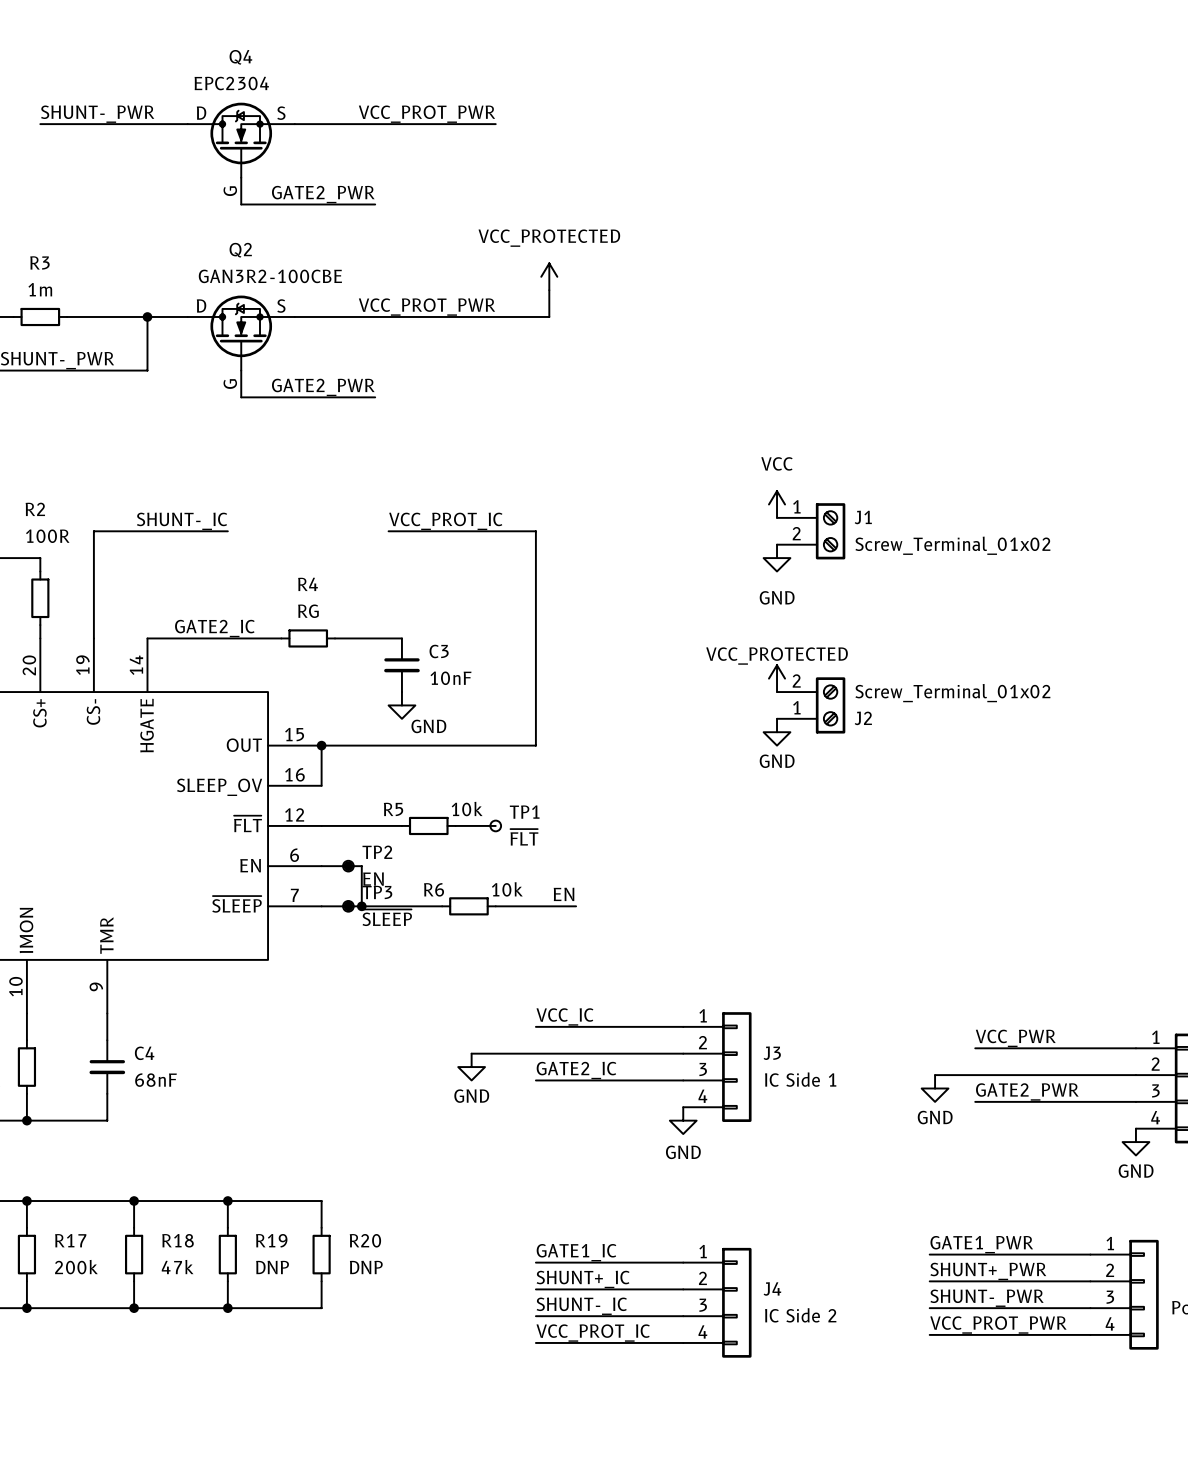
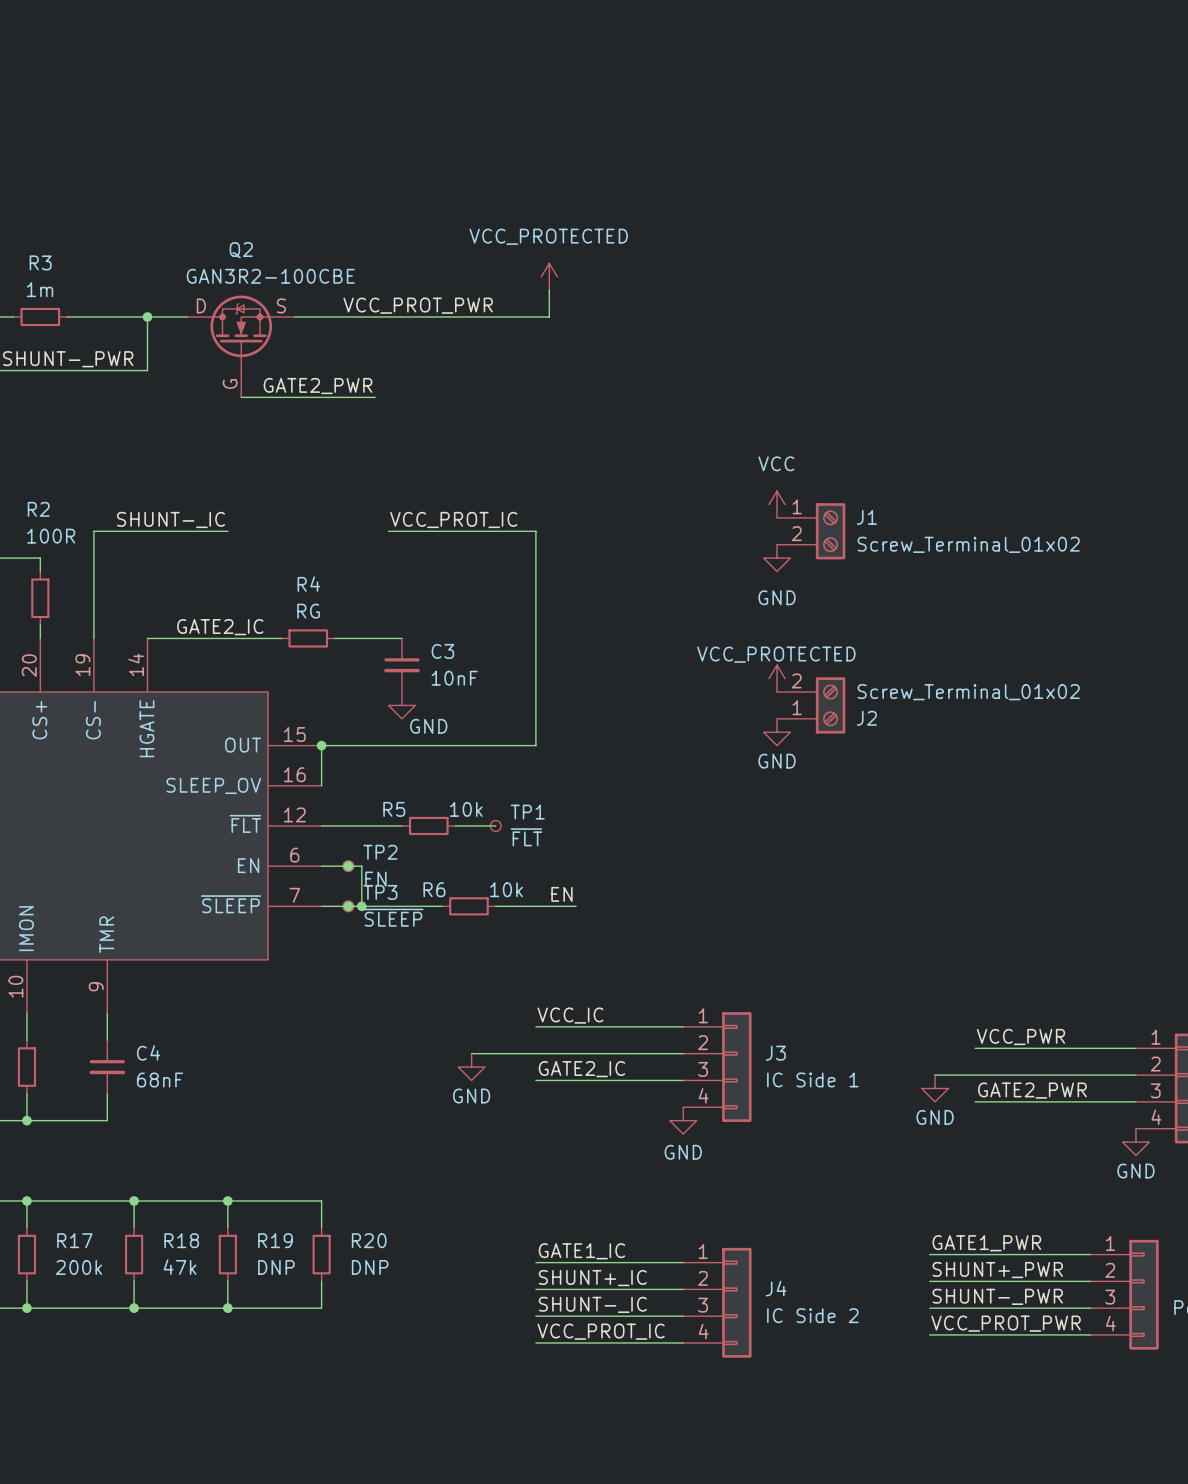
label: SHUNT-_PWR (97, 114) -> none
label: VCC_PROT_PWR (427, 114) -> none
wire: (40, 124) (187, 124) -> none
wire: (294, 124) (495, 124) -> none
Q4: EPC2304 (241, 153) -> none
label: GATE2_PWR (323, 194) -> none
wire: (241, 204) (375, 204) -> none

